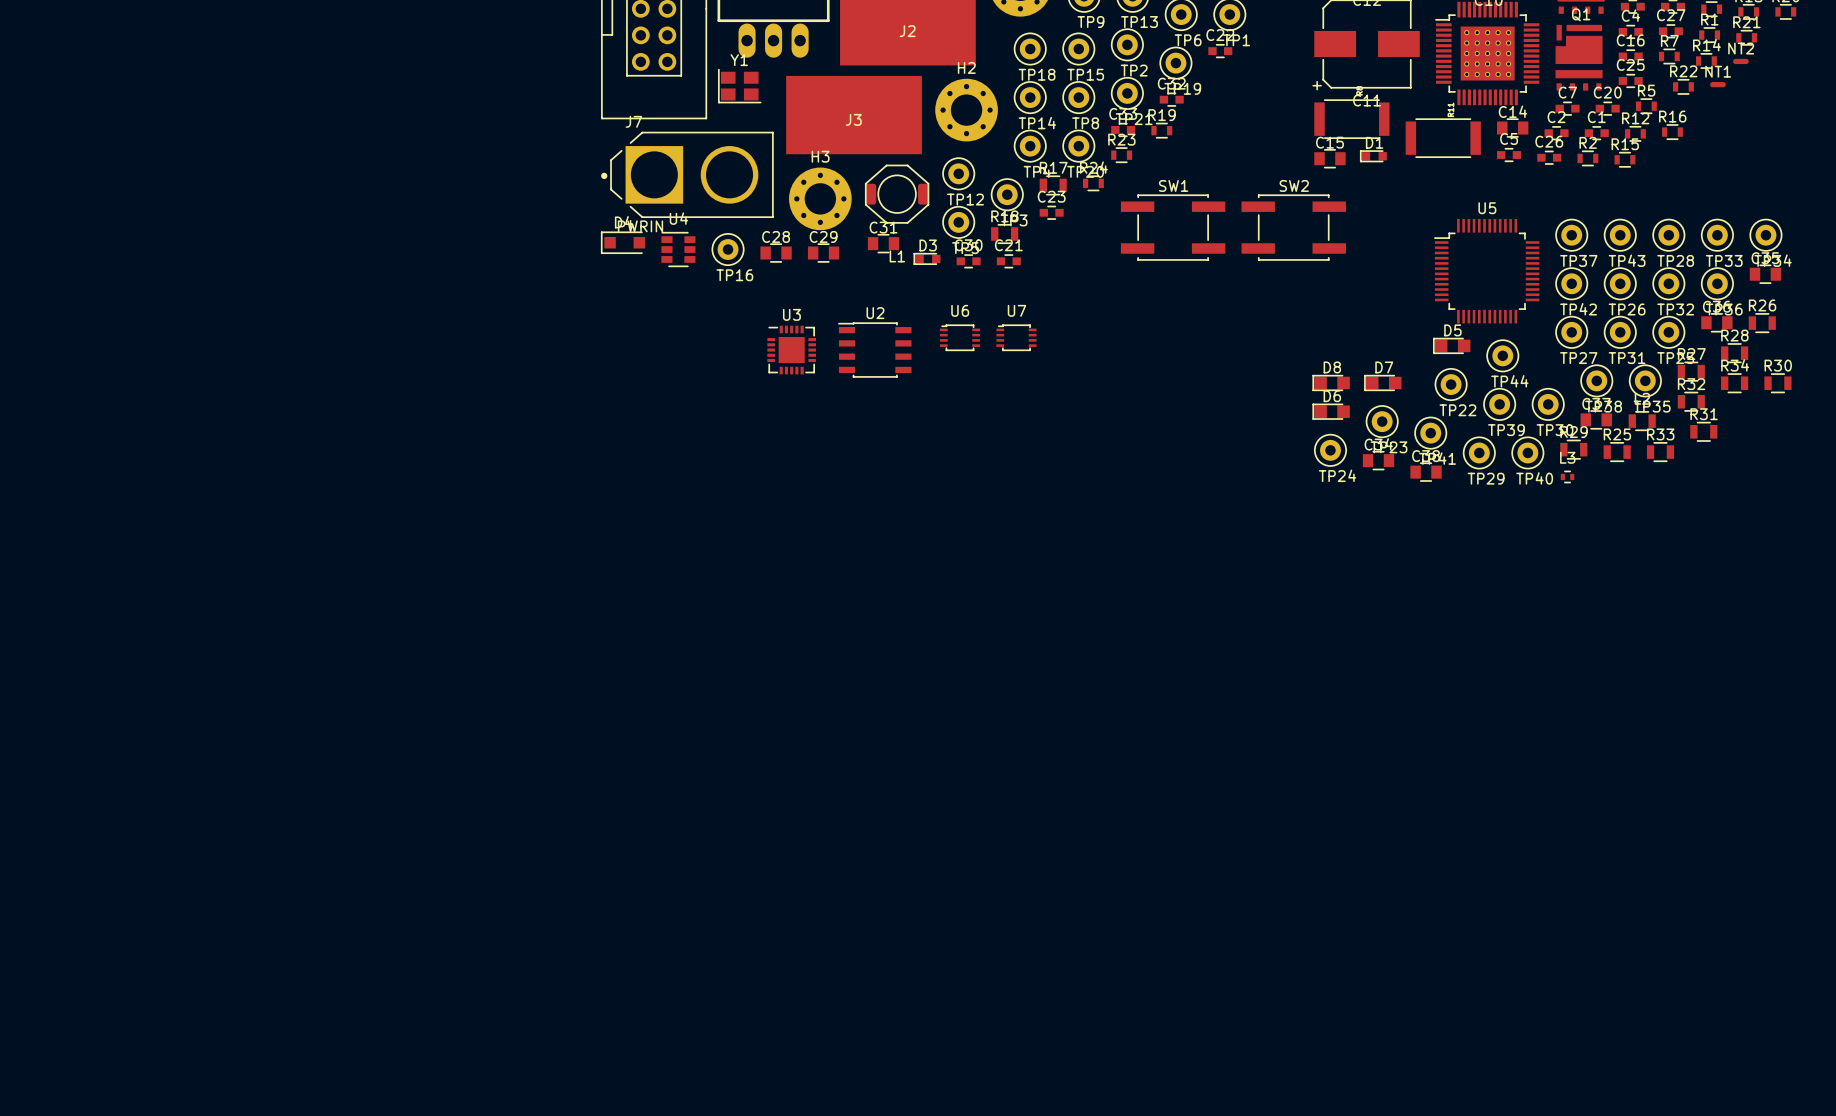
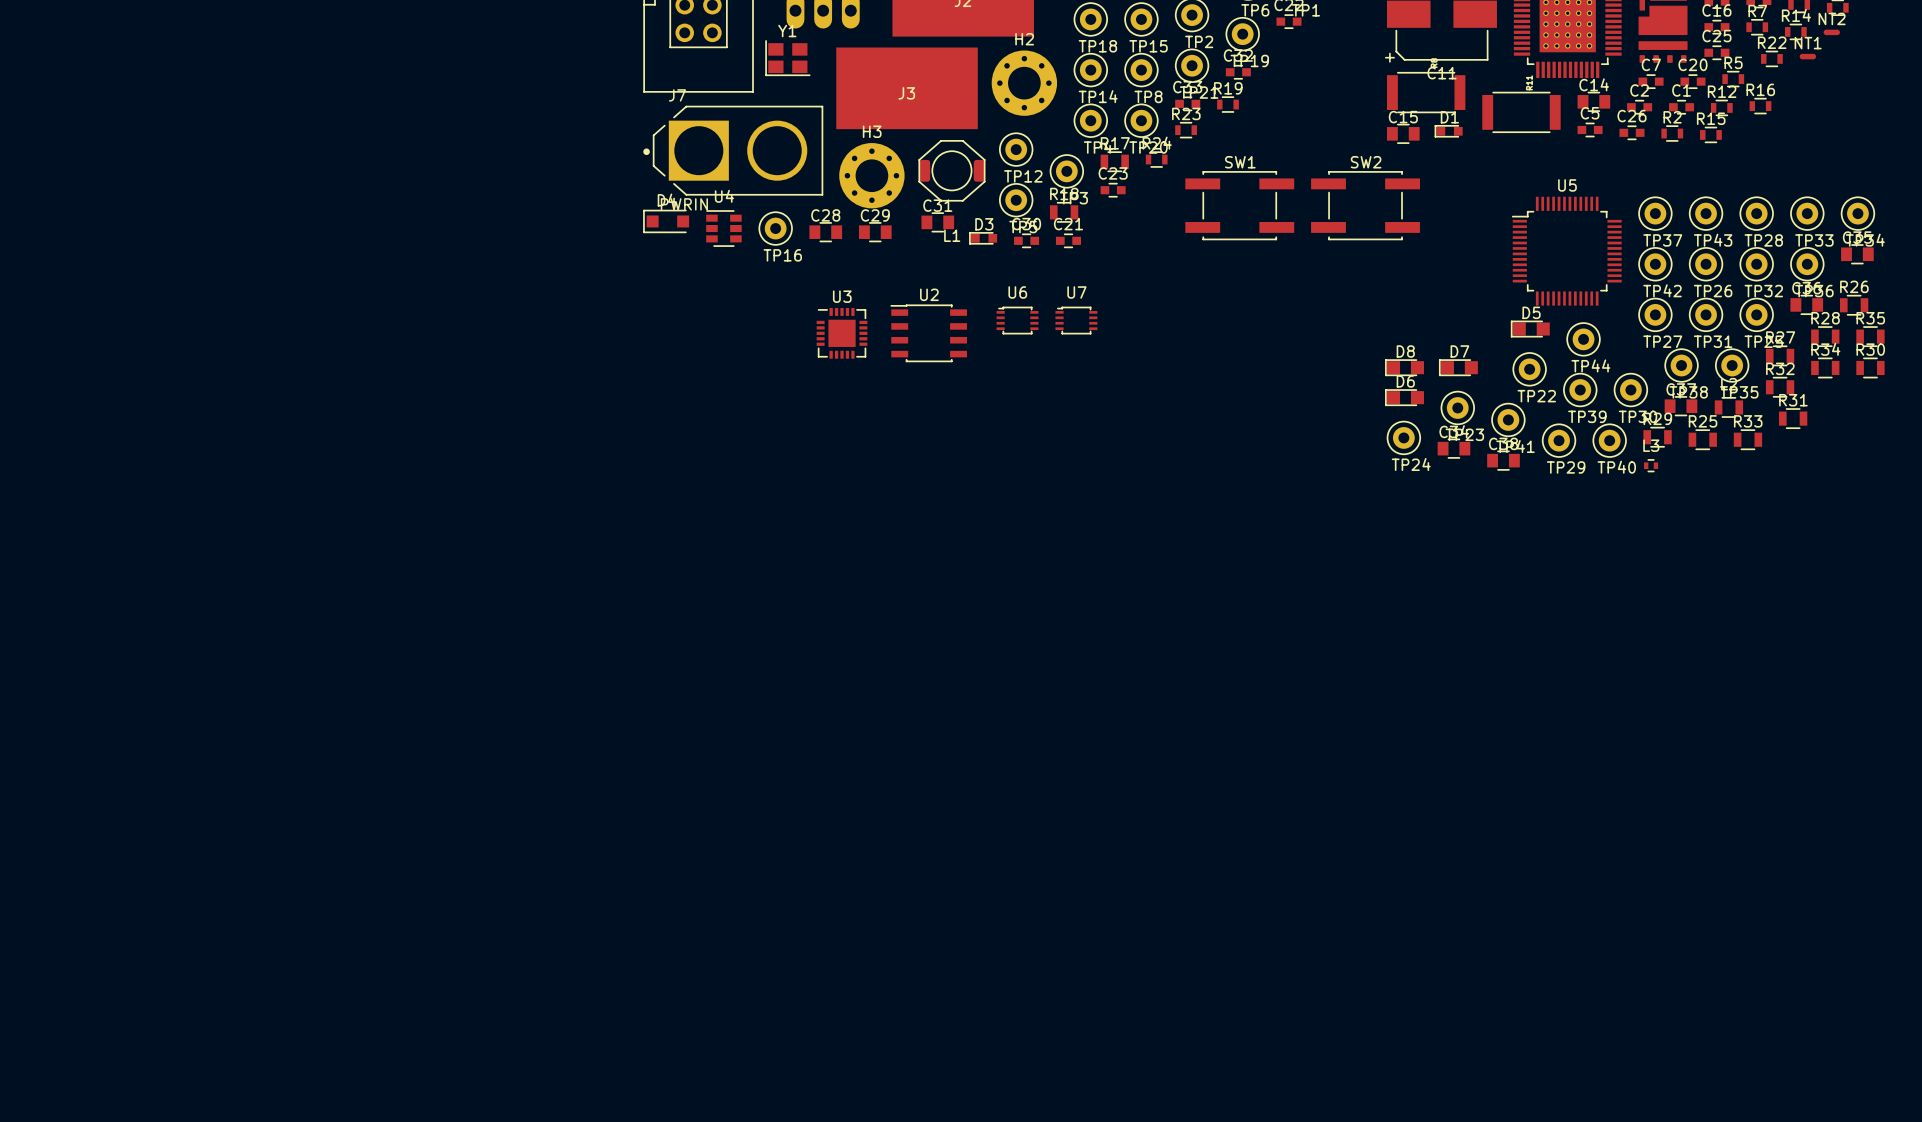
R35: none -> (1870, 336)

